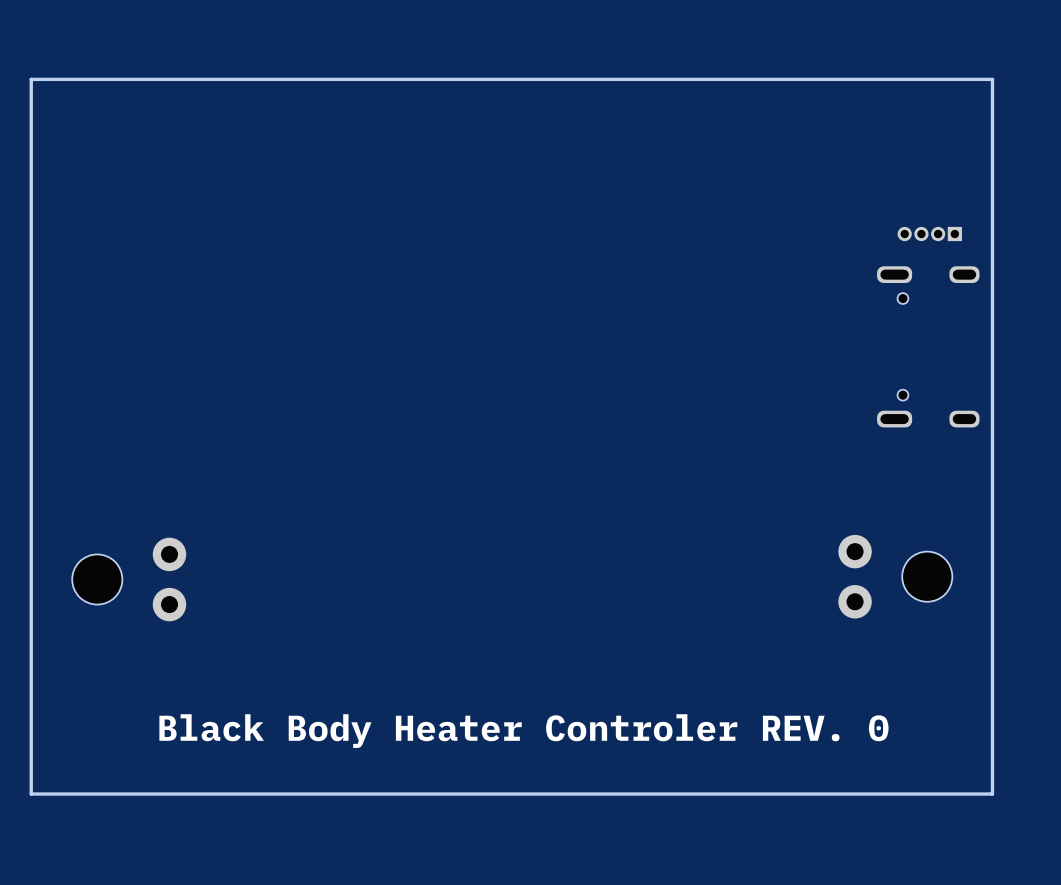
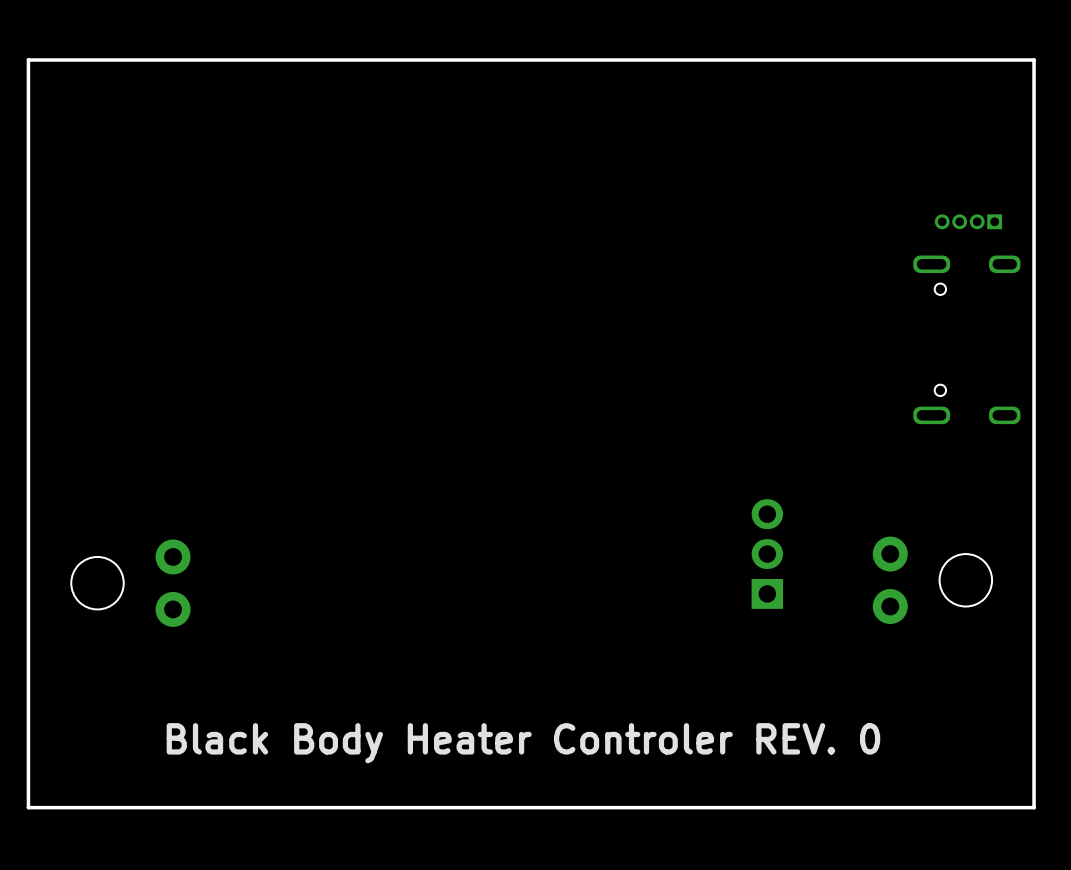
part: none -> (767, 554)

